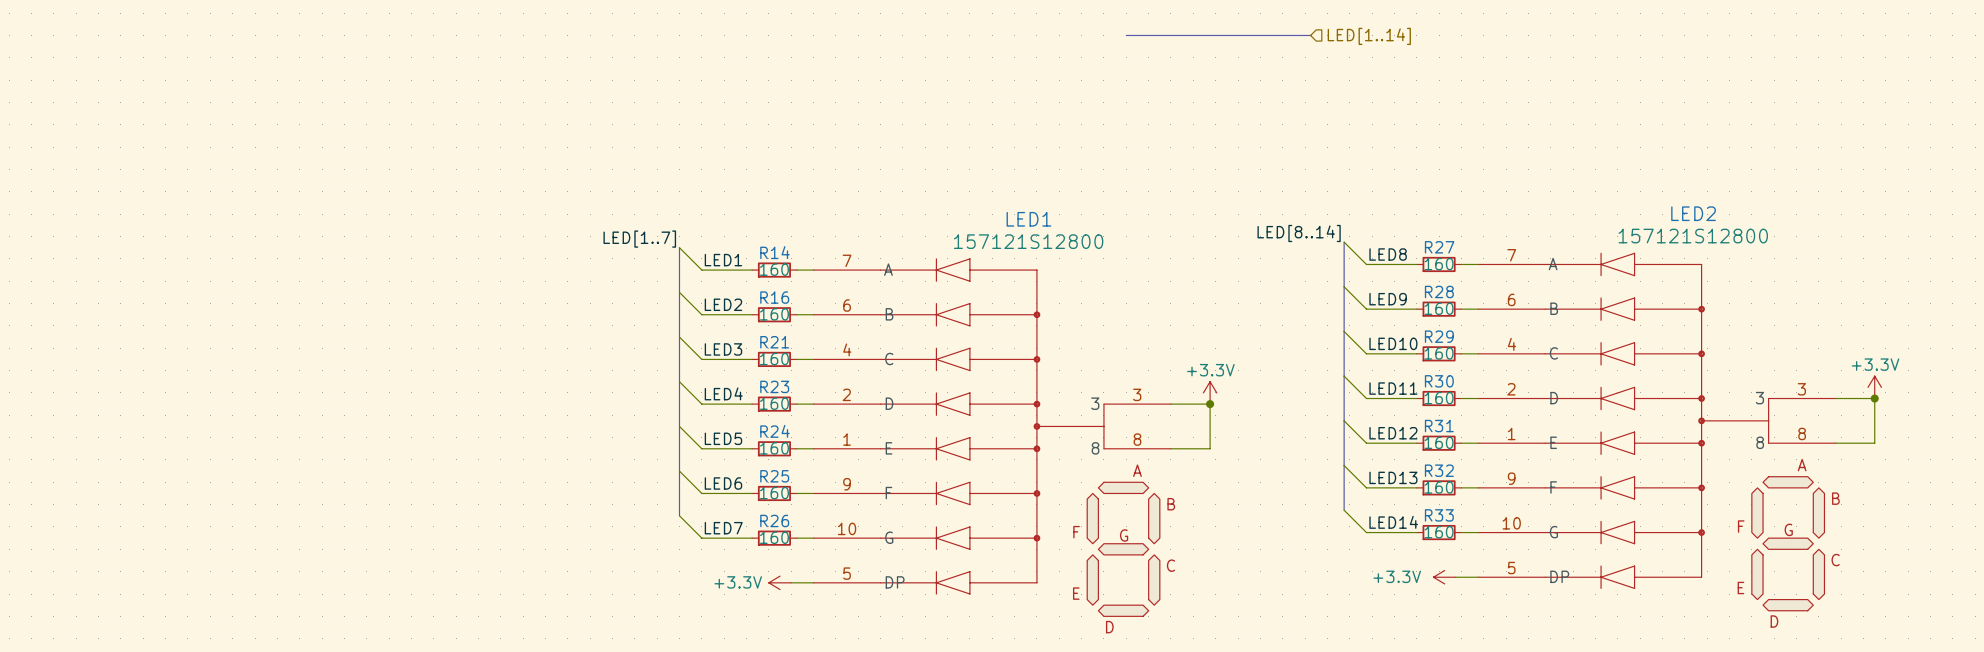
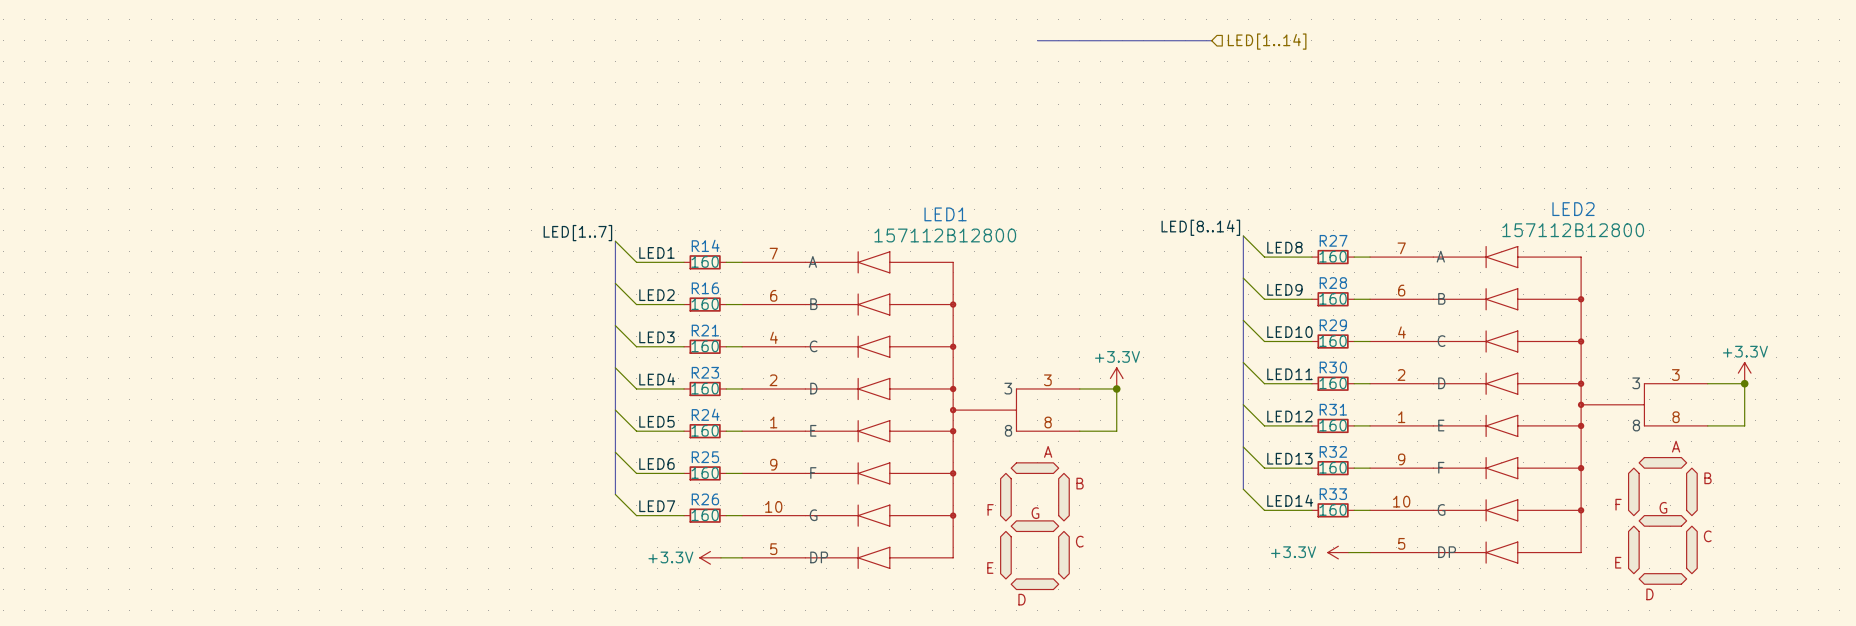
LED2 value: 157121S12800 (1693, 236) -> 157112B12800 (1573, 230)
LED1 value: 157121S12800 (1028, 241) -> 157112B12800 (945, 235)

